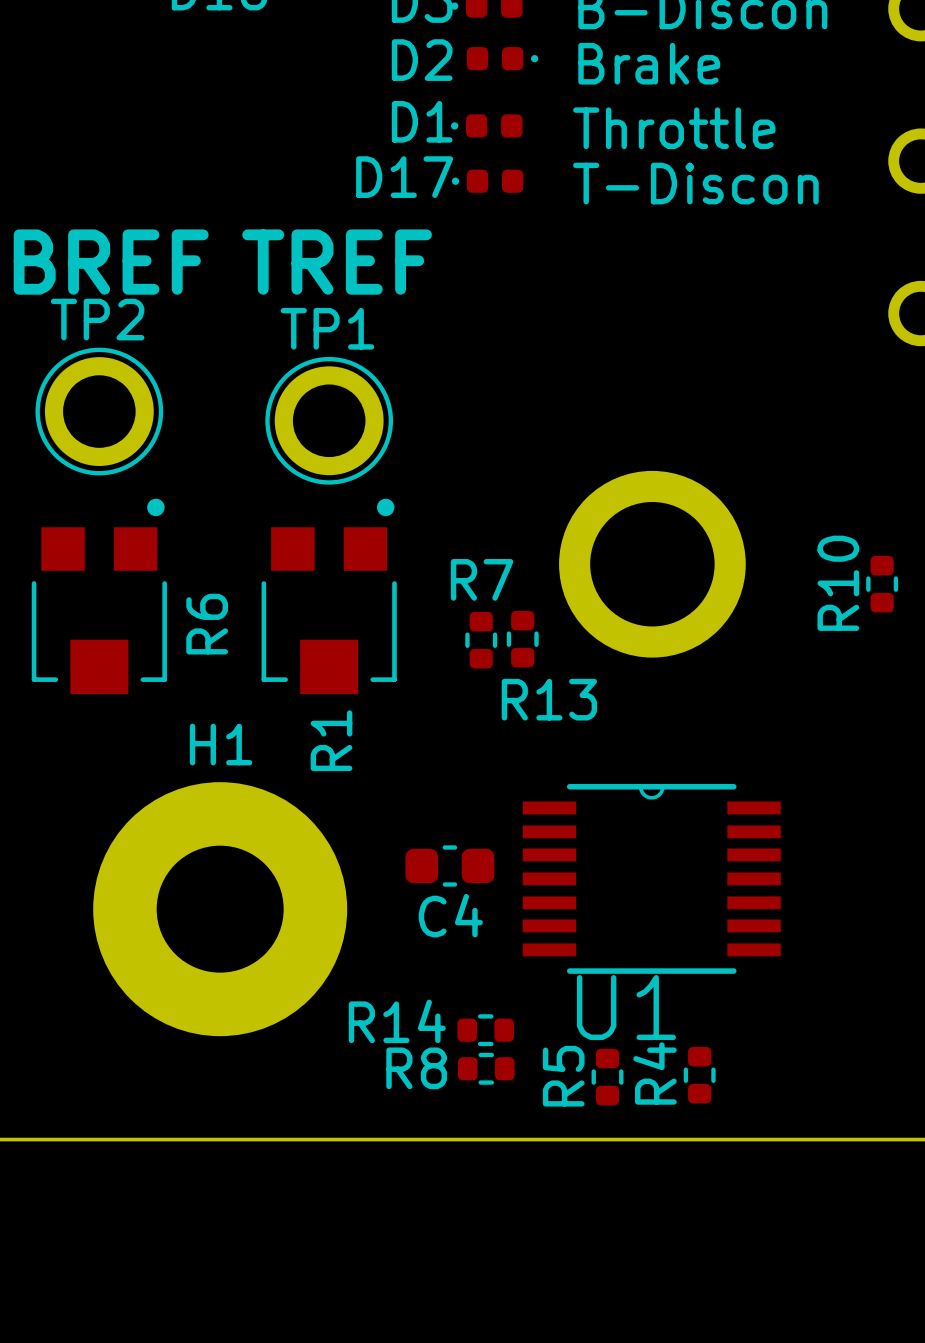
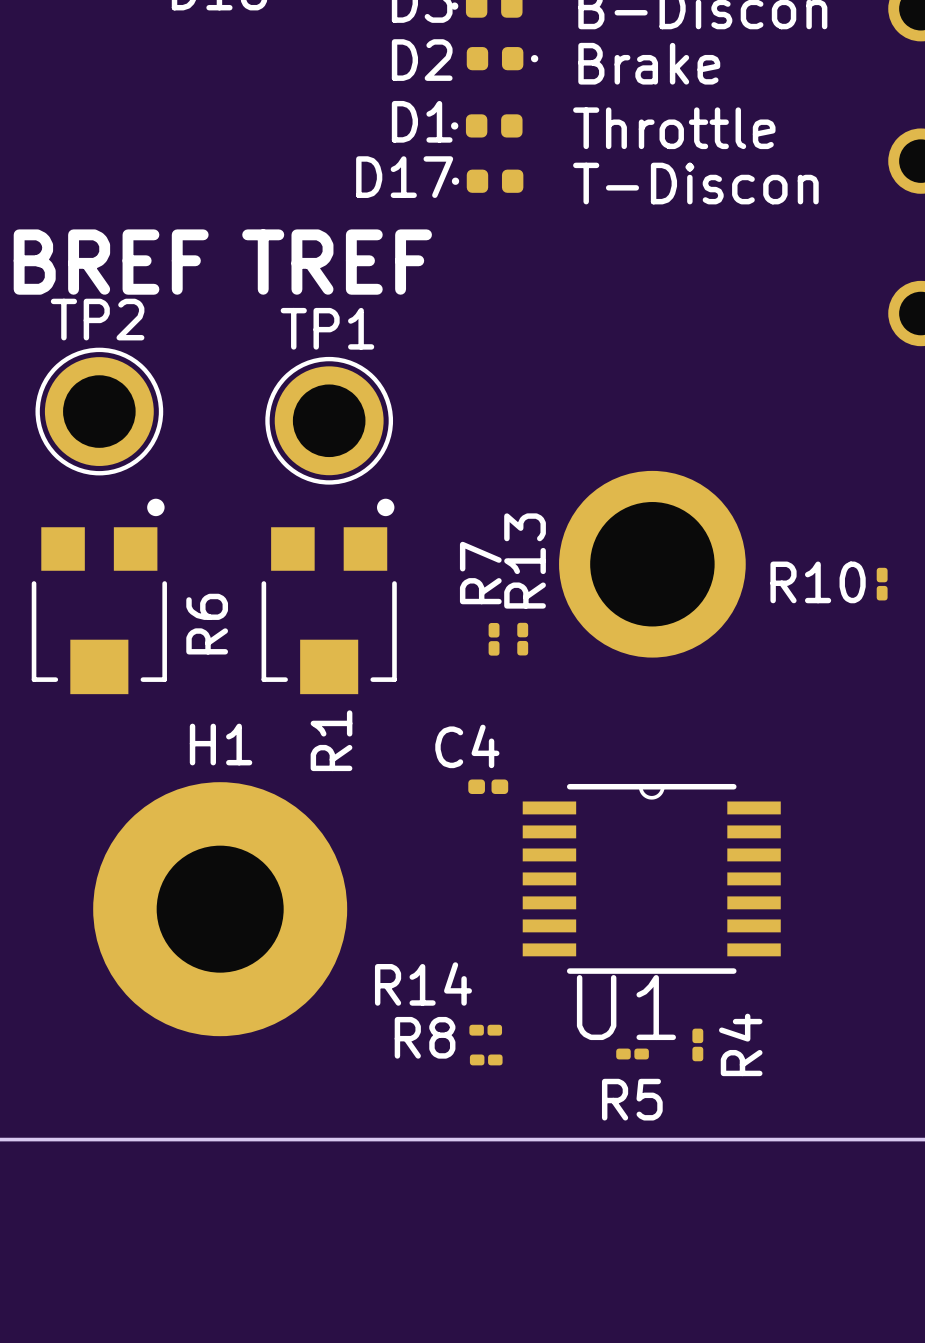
R10 footprint: [866, 555, 899, 613] -> [876, 567, 888, 601]
R13 footprint: [506, 610, 539, 668] -> [517, 622, 529, 656]
R7 footprint: [465, 611, 498, 669] -> [488, 622, 500, 656]
R13 name position: R13 (549, 699) -> R13 (525, 561)
C4 footprint: [405, 845, 495, 887] -> [468, 779, 509, 794]
C4 name position: C4 (450, 915) -> C4 (467, 746)
R14 footprint: [457, 1014, 515, 1047] -> [469, 1024, 503, 1036]
R4 footprint: [683, 1046, 716, 1104] -> [692, 1028, 704, 1062]
R5 footprint: [591, 1048, 624, 1106] -> [616, 1048, 649, 1060]
R8 footprint: [457, 1052, 515, 1085] -> [469, 1054, 503, 1066]
R4 name position: R4 (654, 1073) -> R4 (740, 1044)

